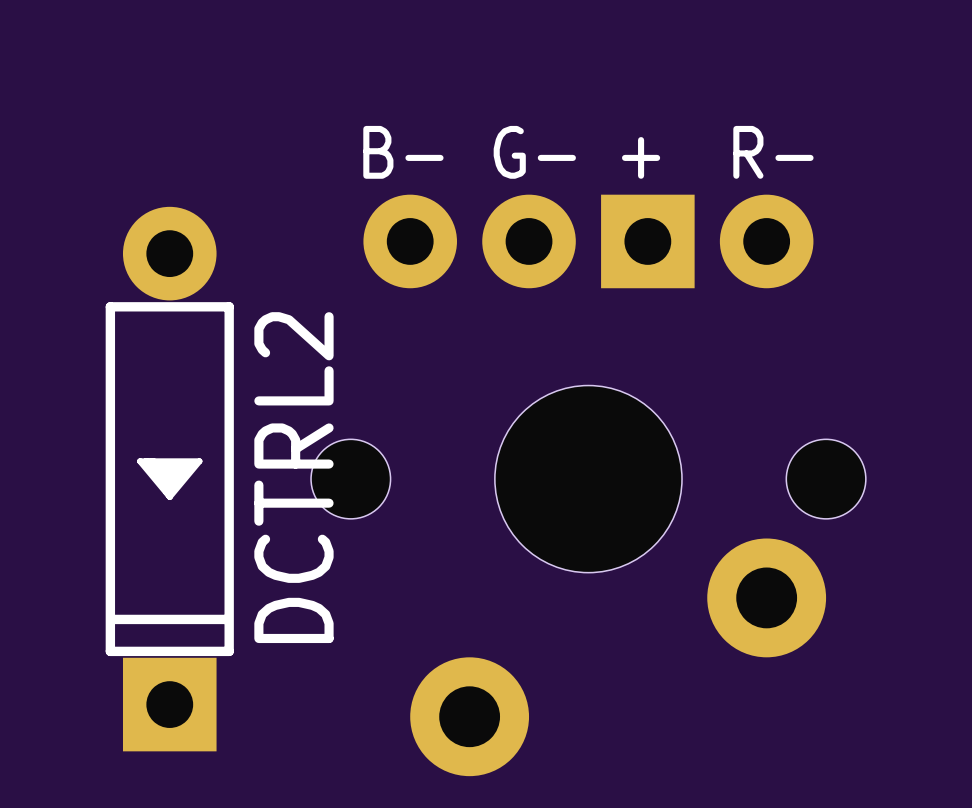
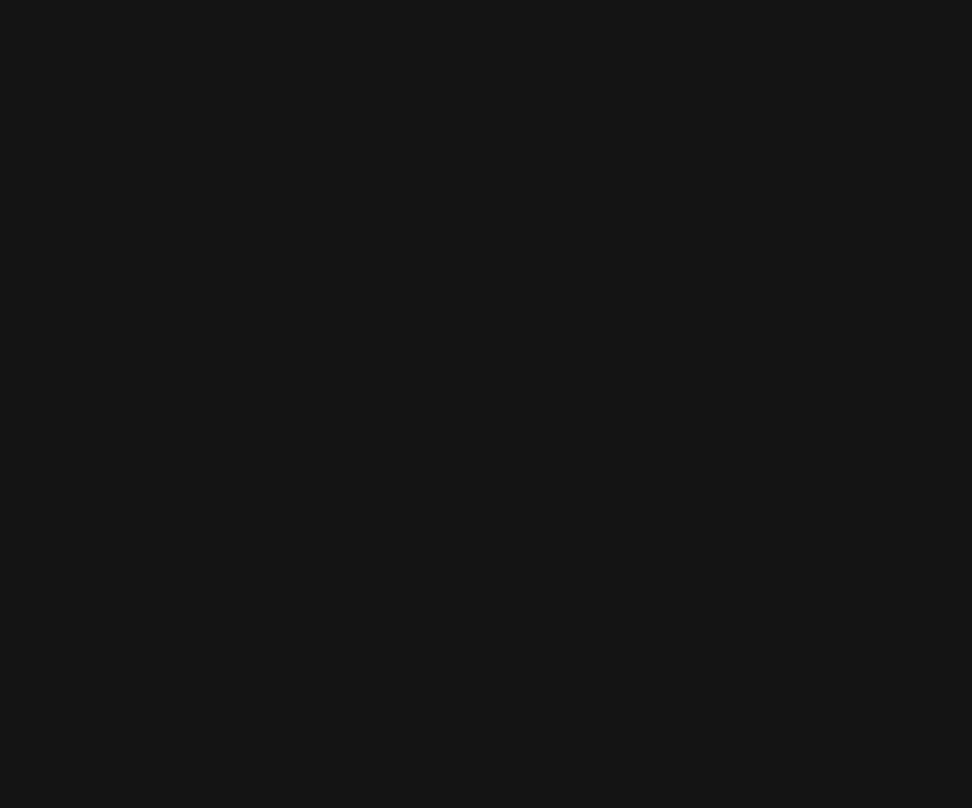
DCTRL2: (169, 479) -> none
part: (588, 485) -> none

